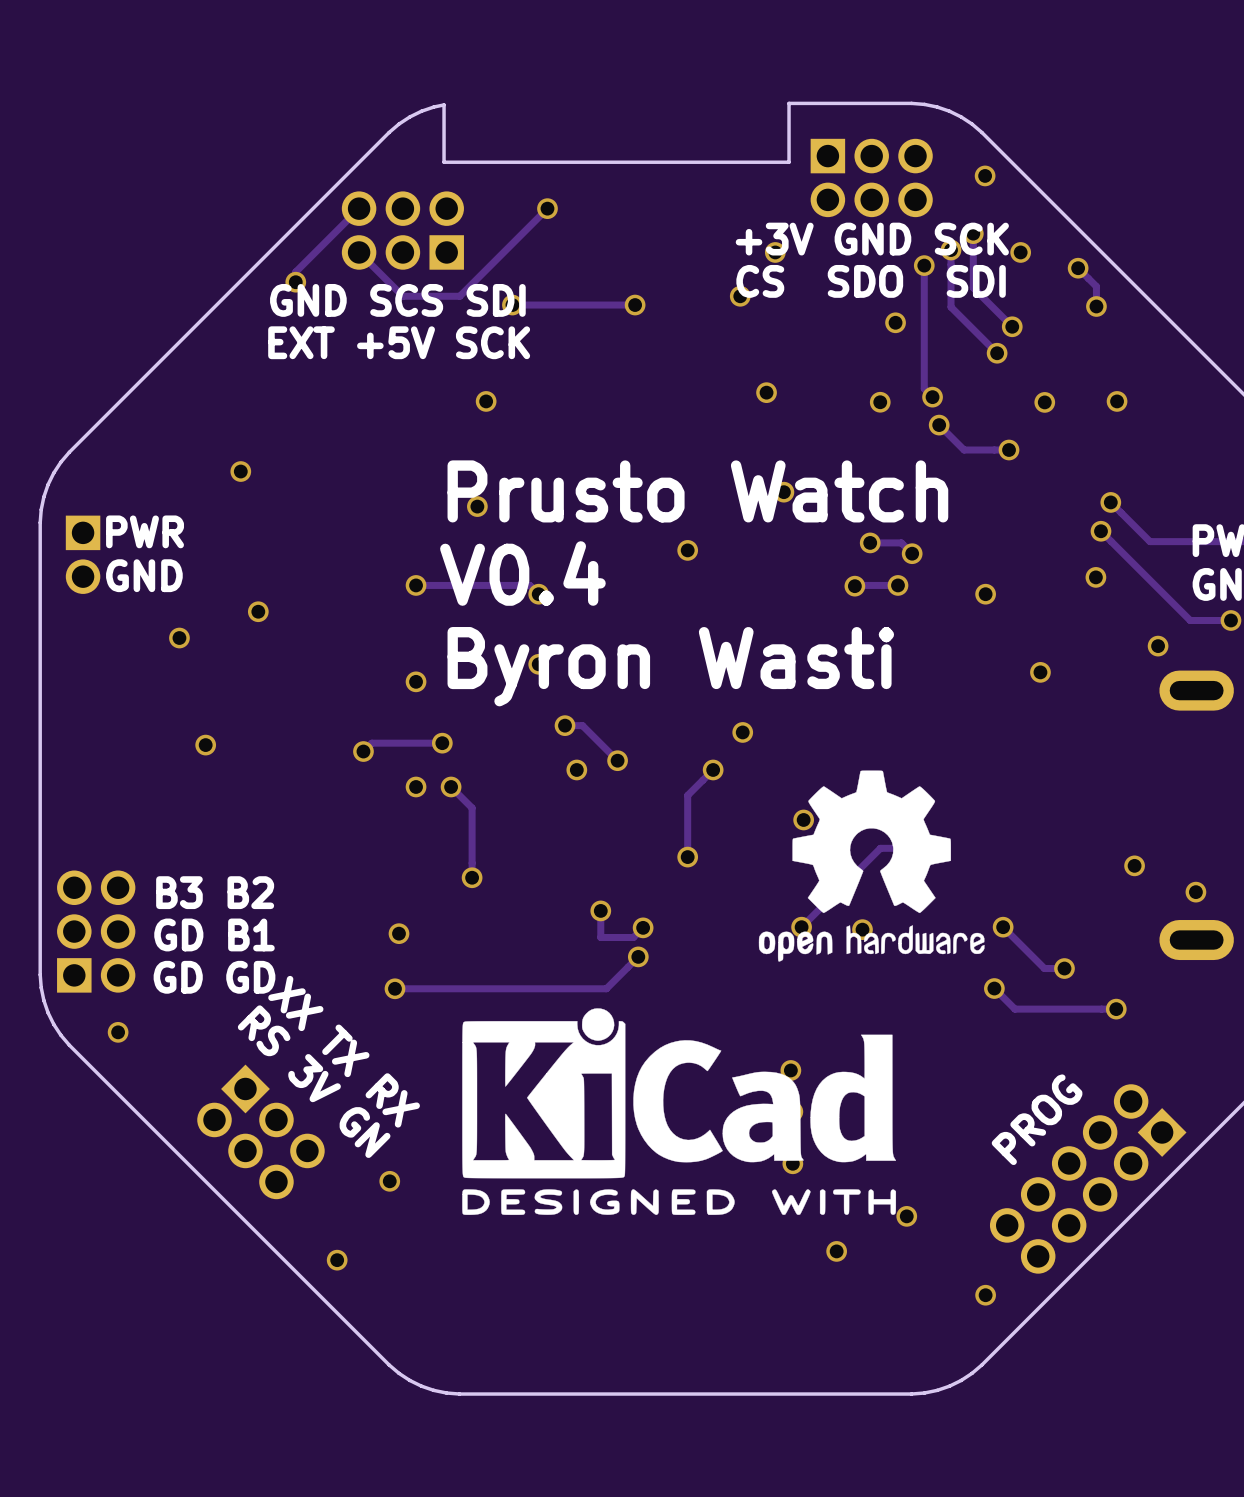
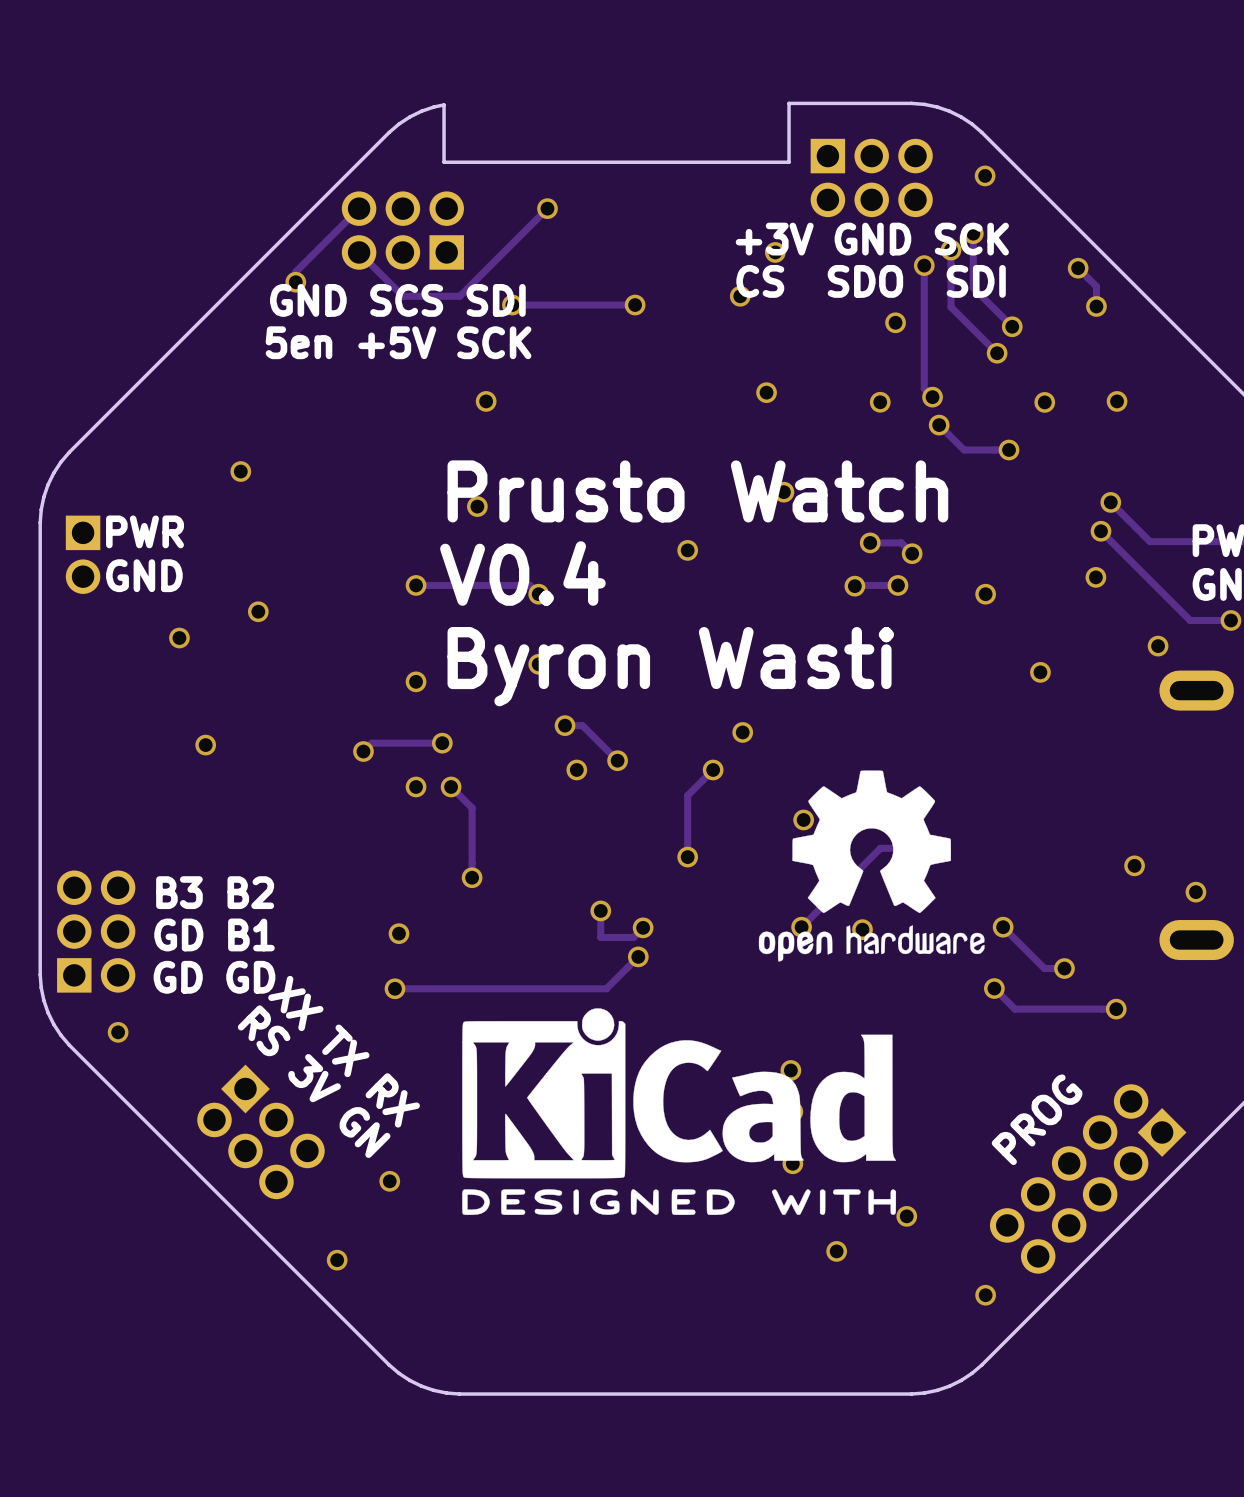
via: (1020, 252) -> none
text: EXT +5V SCK (399, 342) -> 5en +5V SCK (398, 342)

